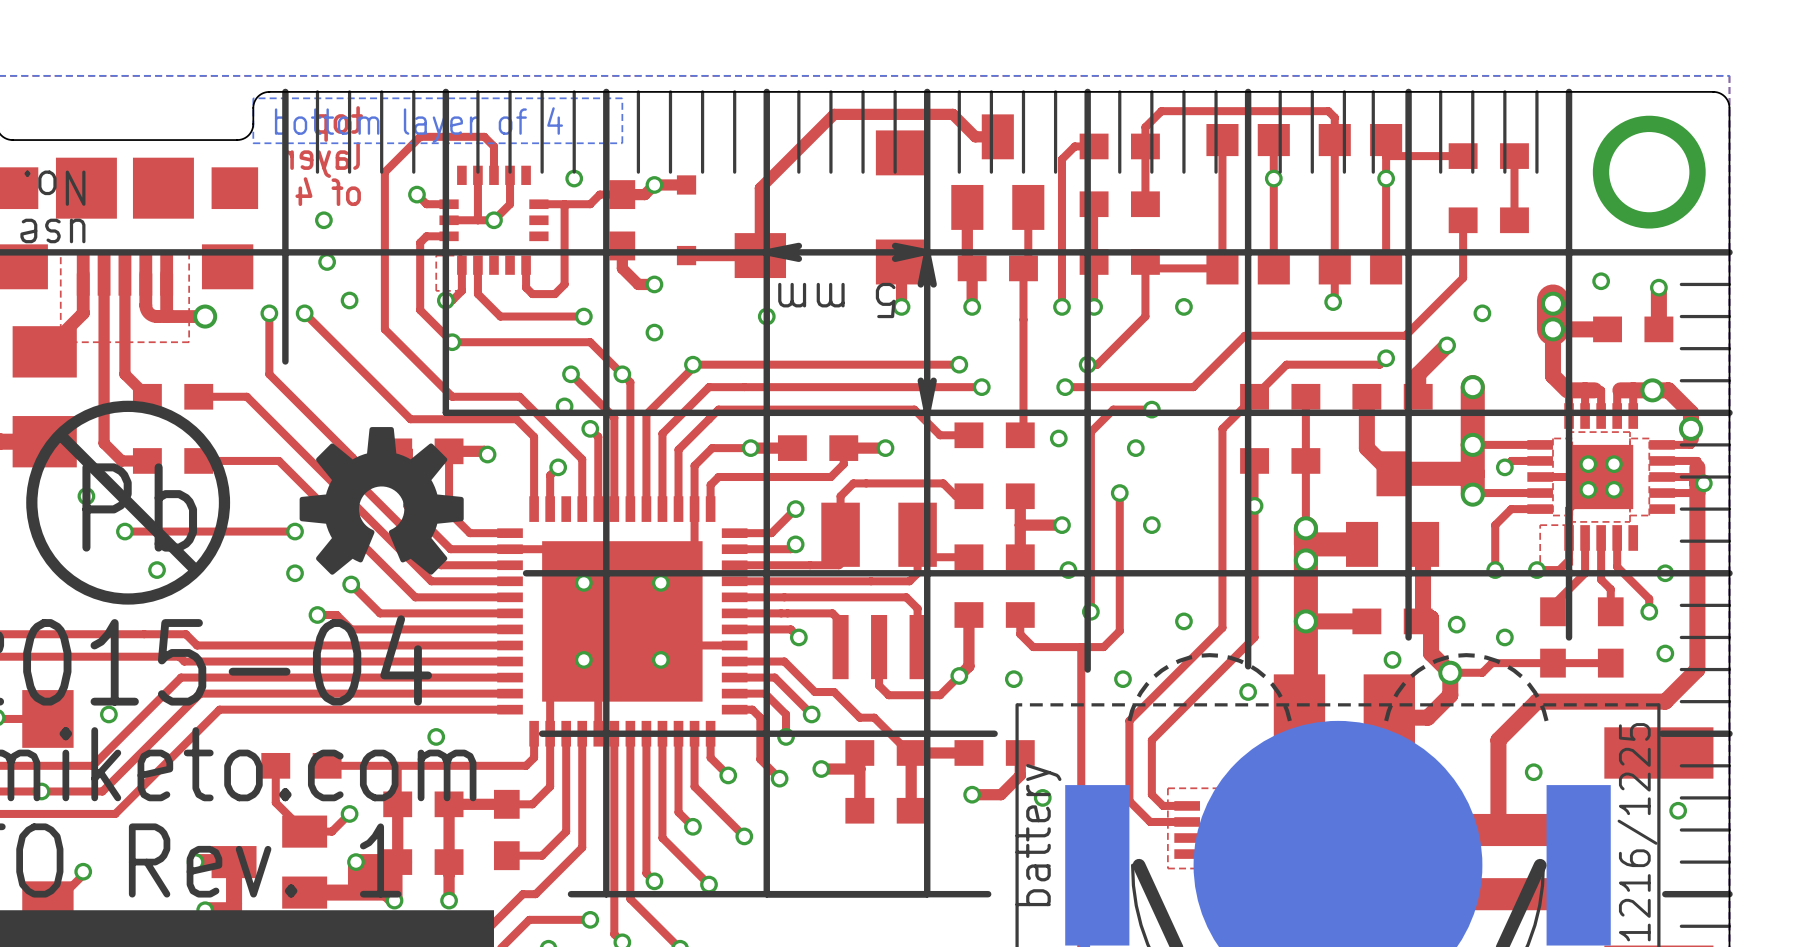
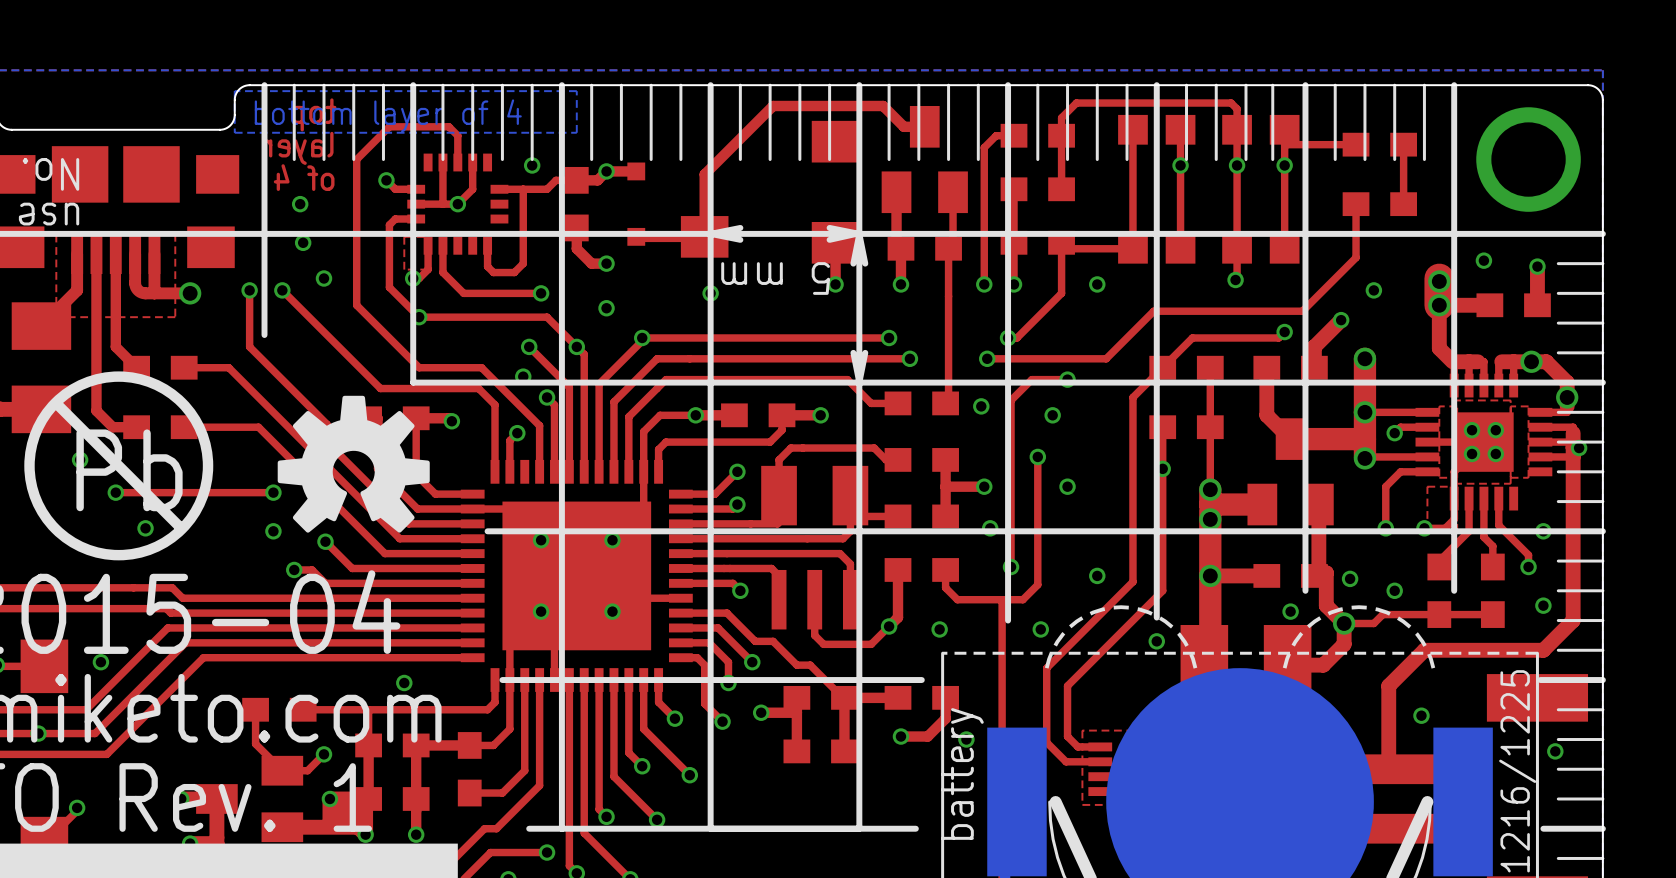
via: none -> (1237, 165)

